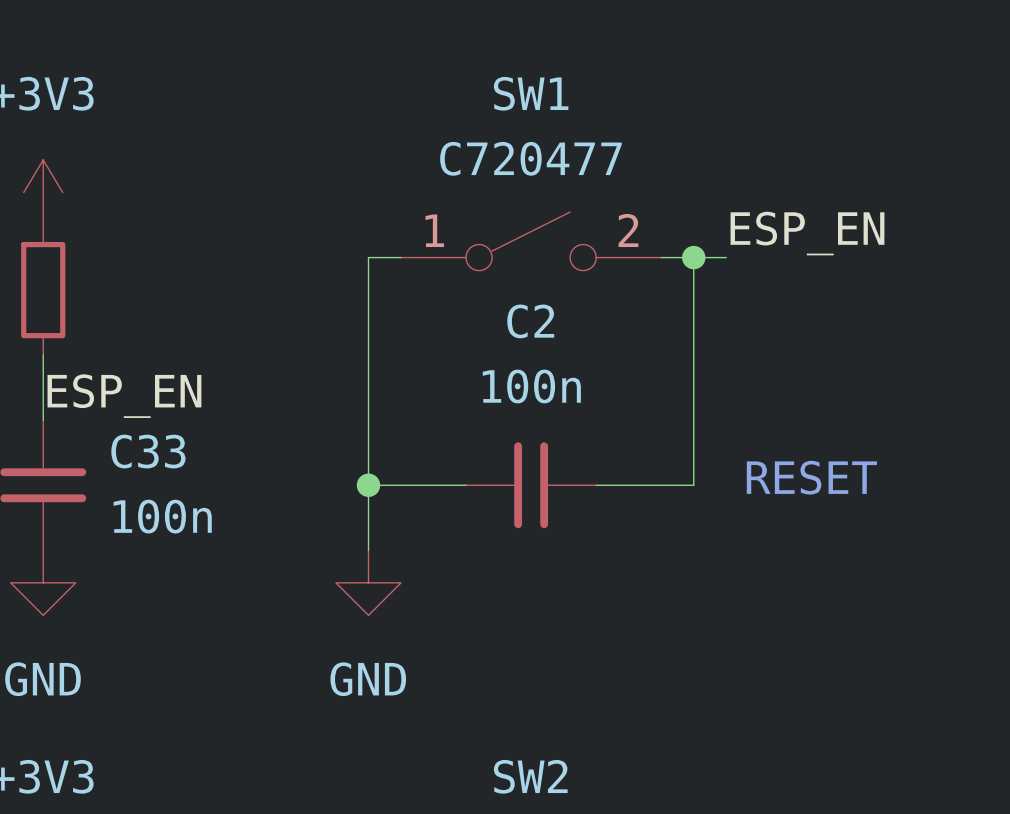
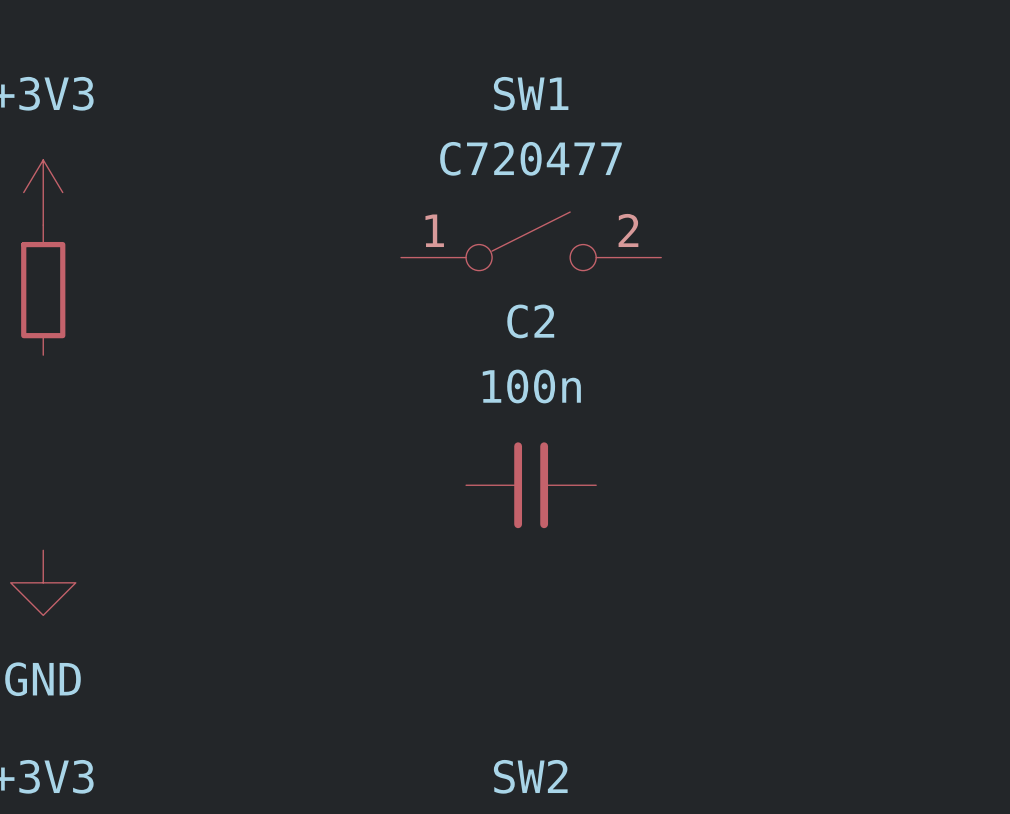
label: ESP_EN (807, 233) -> none
wire: (401, 257) (368, 257) (368, 550) -> none
wire: (661, 257) (726, 257) -> none
wire: (693, 257) (693, 485) (596, 485) -> none
junction: (693, 257) -> none
wire: (43, 355) (43, 420) -> none
label: ESP_EN (124, 396) -> none
text: RESET (811, 477) -> none
C33: 100n (43, 485) -> none
wire: (368, 485) (466, 485) -> none
junction: (368, 485) -> none
power symbol: GND (368, 582) -> none

